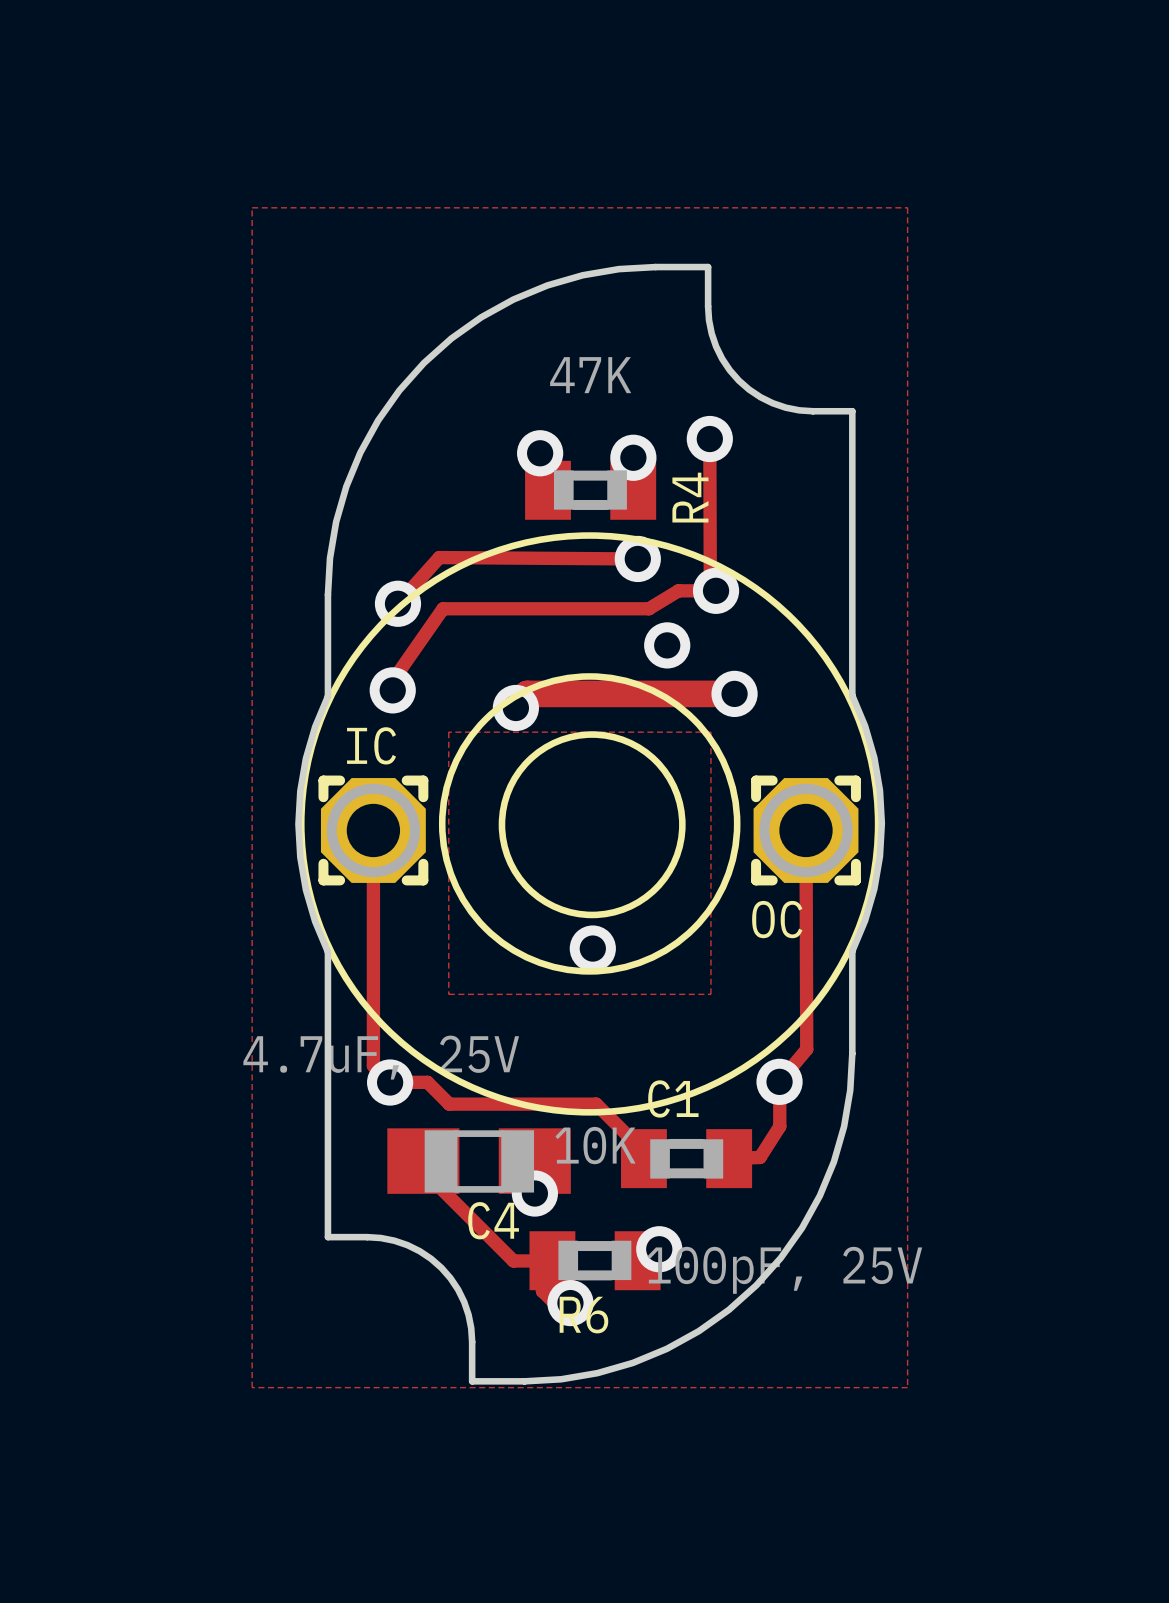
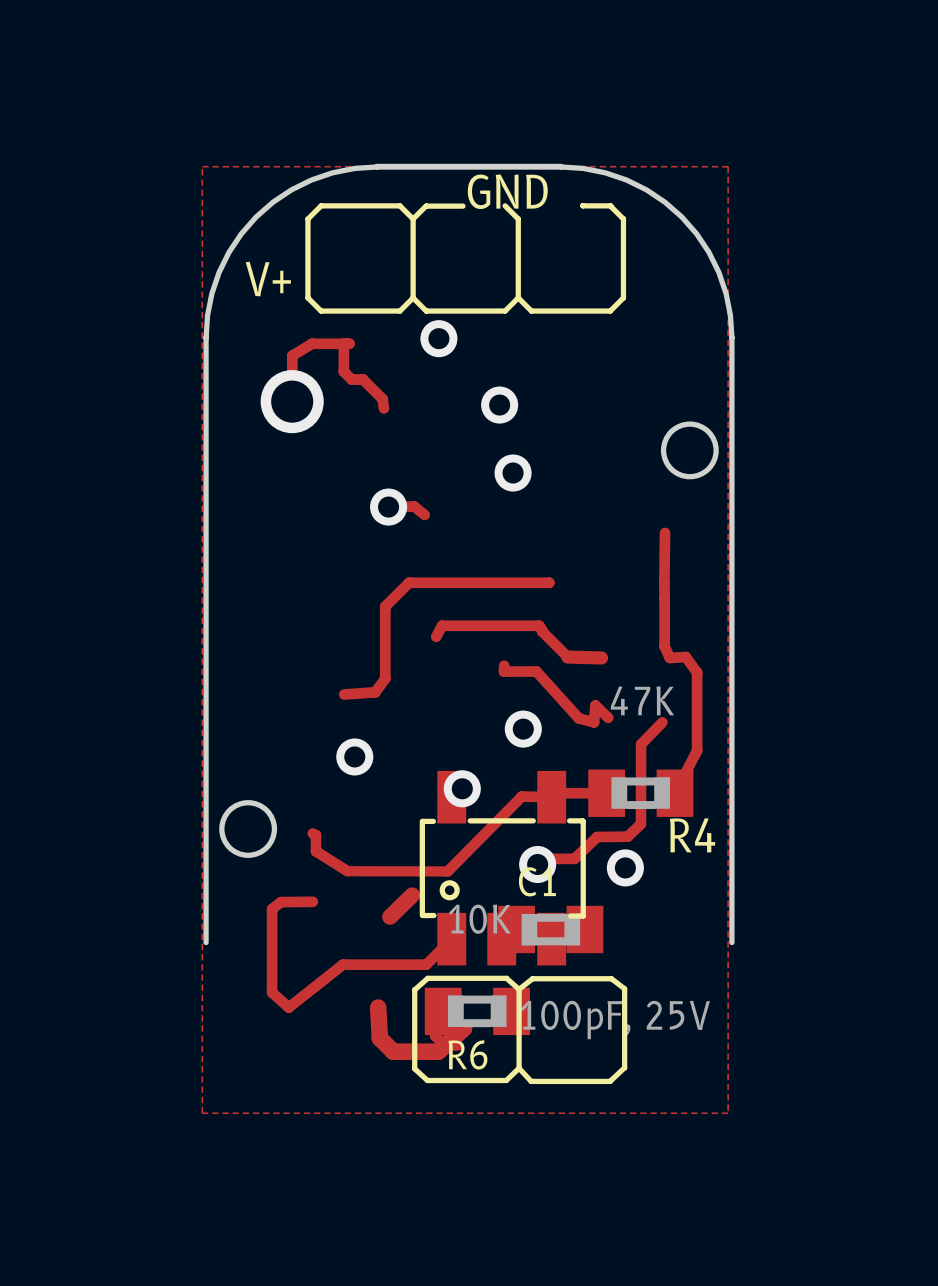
text: none -> GND (507, 191)
line: none -> (462, 206) (426, 206) (413, 219)
line: none -> (505, 205) (518, 219) (518, 297)
line: none -> (582, 205) (610, 205)
line: none -> (610, 205) (623, 219) (623, 297) (610, 311) (531, 311) (518, 297)
line: none -> (413, 219) (413, 297)
line: none -> (413, 219) (399, 205) (321, 205) (307, 219) (307, 297) (321, 311) (399, 311) (413, 297)
text: none -> V+ (268, 279)
line: none -> (413, 297) (426, 311) (505, 311) (518, 297)
track: (709, 439) (710, 585) (716, 590) (678, 590) (648, 608) (443, 608) (394, 678) (391, 689) (392, 690) -> none
via: (709, 439) -> none
via position: (540, 453) -> (438, 338)
via: (633, 457) -> none
R4 position: (590, 490) -> (640, 793)
R4 name rotation: 0° (690, 497) -> 90° clockwise (692, 835)
track: none -> (292, 401) (292, 355) (311, 343) (349, 343) (343, 343) (343, 371) (351, 379) (363, 379) (382, 399) (383, 408)
via: none -> (292, 401)
via: none -> (499, 405)
round board edge: none -> [660, 421, 719, 480]
drawing: [298, 532, 882, 1116] -> none
track: (637, 558) (439, 557) (397, 603) -> none
via position: (637, 558) -> (513, 473)
via: (716, 590) -> none
via: (397, 603) -> none
track: none -> (388, 507) (414, 506) (424, 514)
via: none -> (388, 507)
via: (667, 645) -> none
track: none -> (665, 532) (664, 646) (669, 657) (685, 657) (697, 672) (697, 750) (675, 793)
via: (392, 690) -> none
track: (734, 693) (527, 693) (515, 708) -> none
via: (734, 693) -> none
board edge: (852, 695) (865, 726) (874, 757) (879, 790) (881, 823) (879, 856) (874, 888) (865, 920) (852, 951) -> none
board edge: (852, 696) (852, 411) (812, 411) (785, 407) (760, 397) (738, 380) (722, 358) (711, 333) (708, 306) (708, 267) (618, 269) (582, 275) (547, 285) (513, 299) (481, 317) (451, 338) (423, 363) (399, 390) (378, 420) (360, 452) (346, 486) (336, 521) (330, 558) (327, 594) (327, 696) (315, 726) (305, 758) (300, 791) (298, 824) (300, 857) (305, 889) (315, 921) (327, 952) (327, 1237) (367, 1237) (394, 1240) (419, 1251) (441, 1267) (458, 1289) (468, 1314) (472, 1342) (472, 1381) (561, 1379) (597, 1373) (632, 1362) (666, 1348) (698, 1331) (728, 1309) (756, 1285) (780, 1257) (802, 1227) (819, 1195) (833, 1161) (844, 1126) (850, 1090) (852, 1053) (852, 952) -> none
via: (515, 708) -> none
track: none -> (549, 582) (409, 582) (385, 606) (385, 678) (375, 692) (344, 694)
zone outline: (448, 732) (710, 732) (710, 994) (448, 994) (448, 732) -> none
track: none -> (436, 636) (442, 625) (539, 625) (542, 631) (567, 657) (601, 657)
track: none -> (504, 665) (503, 671) (536, 671) (578, 718) (594, 722) (595, 705) (608, 717)
track: (373, 830) (373, 1065) (390, 1082) -> none
IC: (373, 830) -> none
track: (806, 830) (806, 1049) (779, 1081) (779, 1126) (760, 1157) (729, 1158) -> none
OC: (806, 830) -> none
track: none -> (662, 722) (641, 744) (640, 824) (627, 836) (597, 837) (574, 858) (552, 858) (541, 869) (536, 864)
via: none -> (523, 729)
via: none -> (354, 756)
via position: (592, 948) -> (462, 788)
track: none -> (606, 793) (544, 793) (551, 797) (521, 796) (447, 871) (347, 871) (315, 851) (315, 835) (312, 833)
round board edge: none -> [219, 800, 278, 858]
via: none -> (537, 864)
track: (390, 1082) (427, 1082) (449, 1104) (596, 1104) (643, 1151) (643, 1158) -> none
via: (390, 1082) -> none
part: none -> (502, 868)
track: none -> (412, 895) (390, 916)
track: none -> (312, 901) (281, 902) (272, 909) (272, 992) (288, 1007) (342, 964) (426, 964) (451, 939)
track: (423, 1161) (423, 1170) (513, 1260) (552, 1260) -> none
C4: 4.7uF, 25V (479, 1161) -> none
board edge: none -> (206, 942) (206, 337) (211, 293) (219, 272) (241, 233) (272, 202) (311, 179) (332, 172) (376, 166) (561, 166) (605, 172) (626, 179) (665, 202) (696, 233) (718, 272) (726, 293) (731, 337) (731, 942)
via: (534, 1193) -> none
line: none -> (519, 989) (519, 1068)
line: none -> (519, 989) (532, 978) (611, 978) (624, 988) (624, 1067) (610, 1081) (531, 1081) (519, 1068)
line: none -> (519, 989) (506, 978) (427, 978) (414, 989) (414, 1068) (427, 1080) (506, 1080) (519, 1068)
via: (659, 1249) -> none
track: none -> (378, 1007) (379, 1038) (393, 1051) (438, 1051) (464, 1028)
via: (570, 1303) -> none

